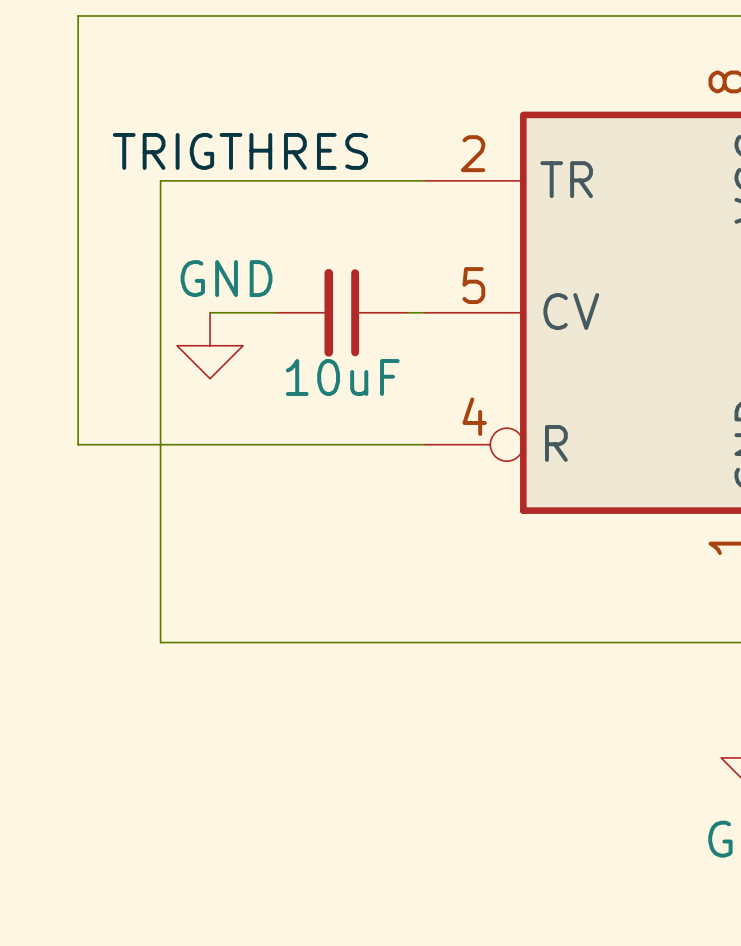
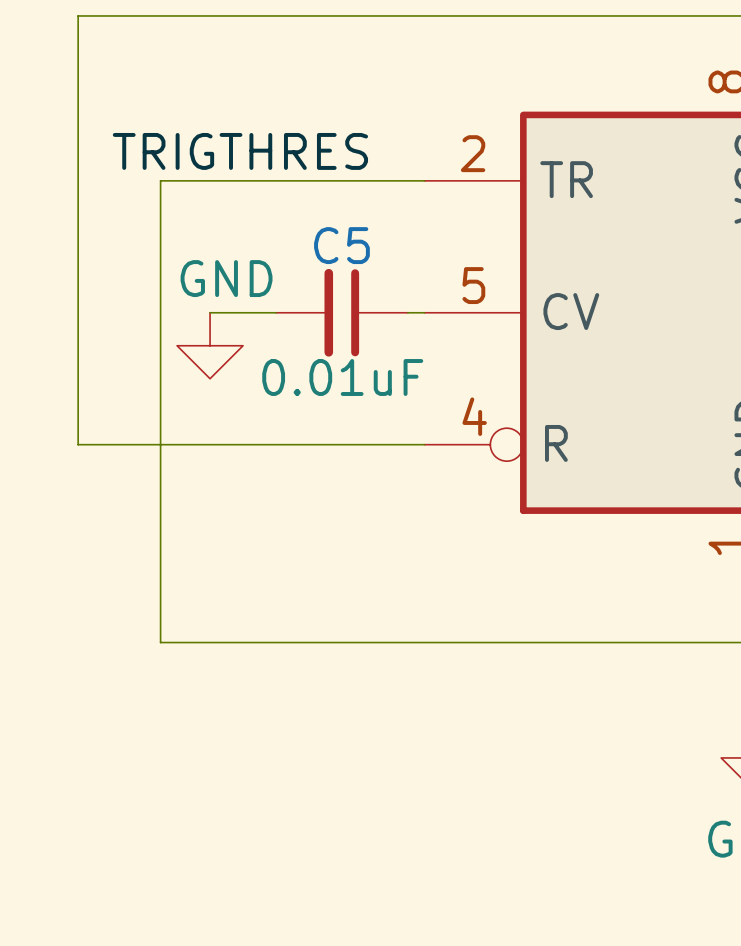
C5 name: none -> C5 (341, 245)
C5 value: 10uF (342, 377) -> 0.01uF (342, 377)

